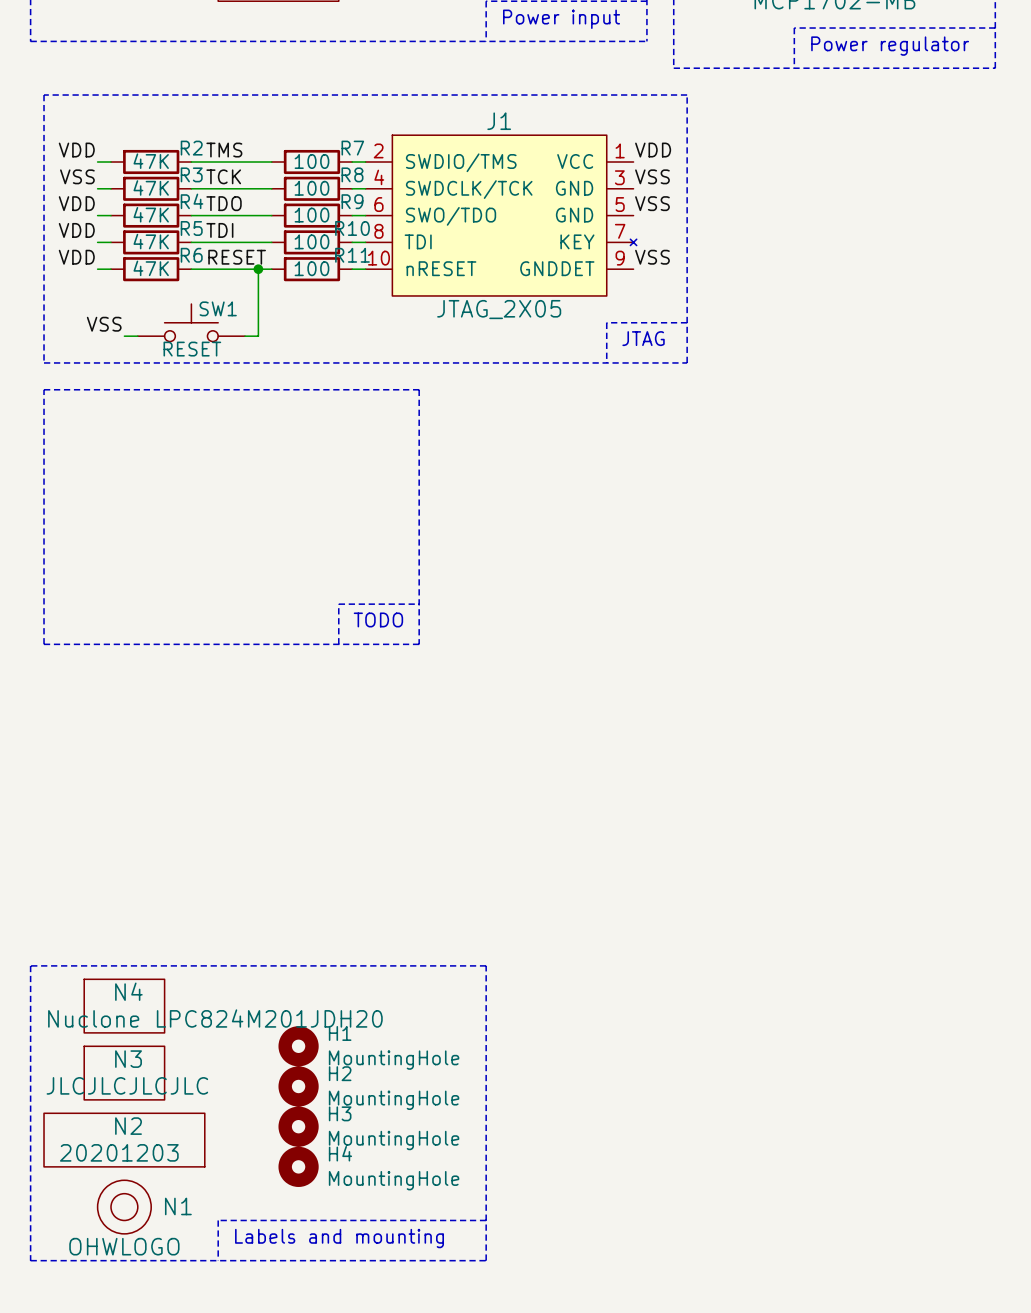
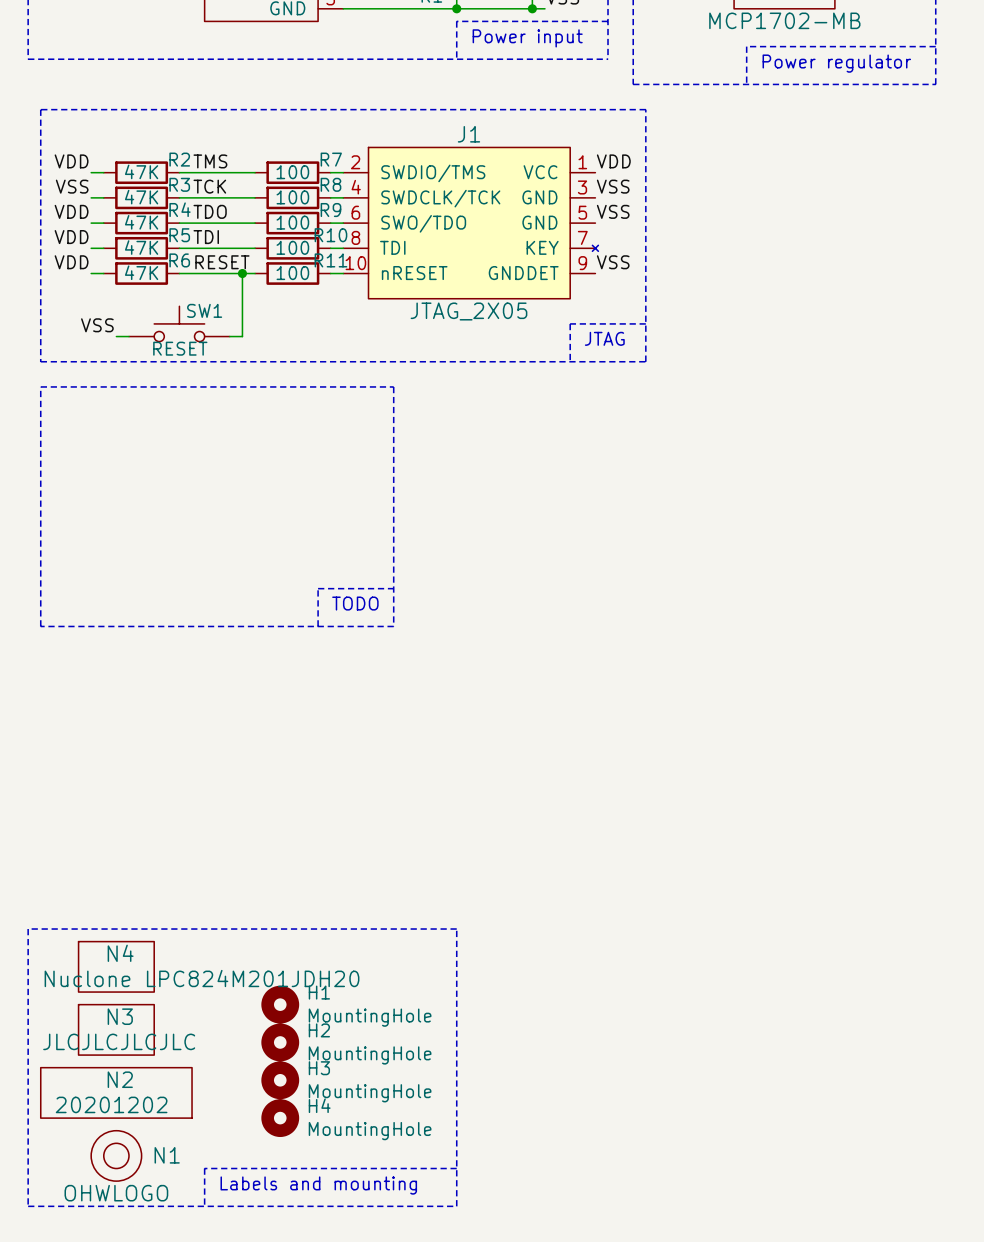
N2 value: 20201203 (119, 1152) -> 20201202 (111, 1104)

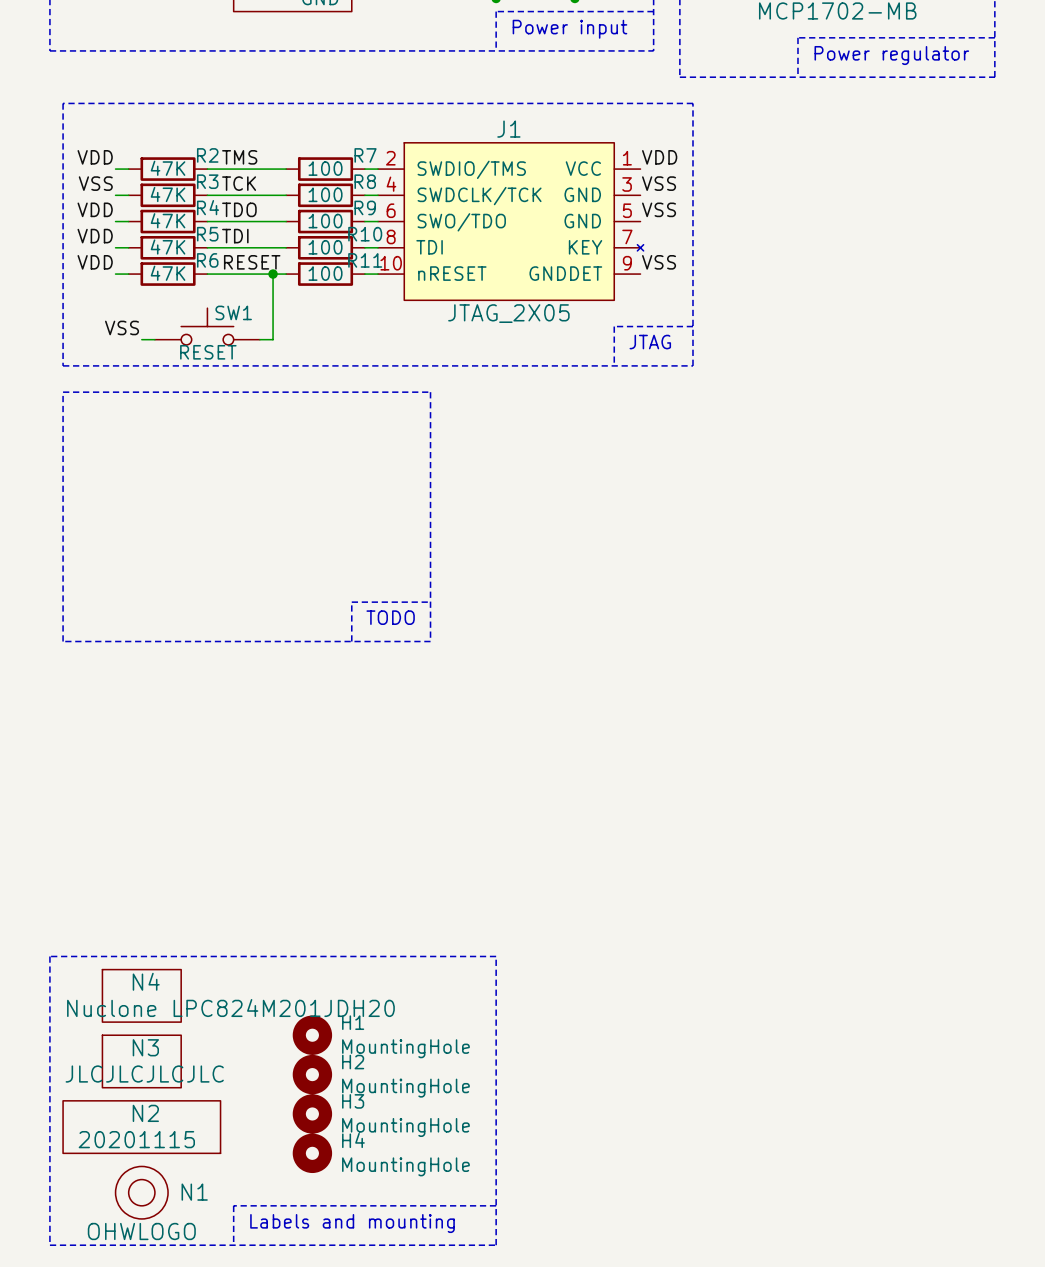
N2 value: 20201202 (111, 1104) -> 20201115 (136, 1139)

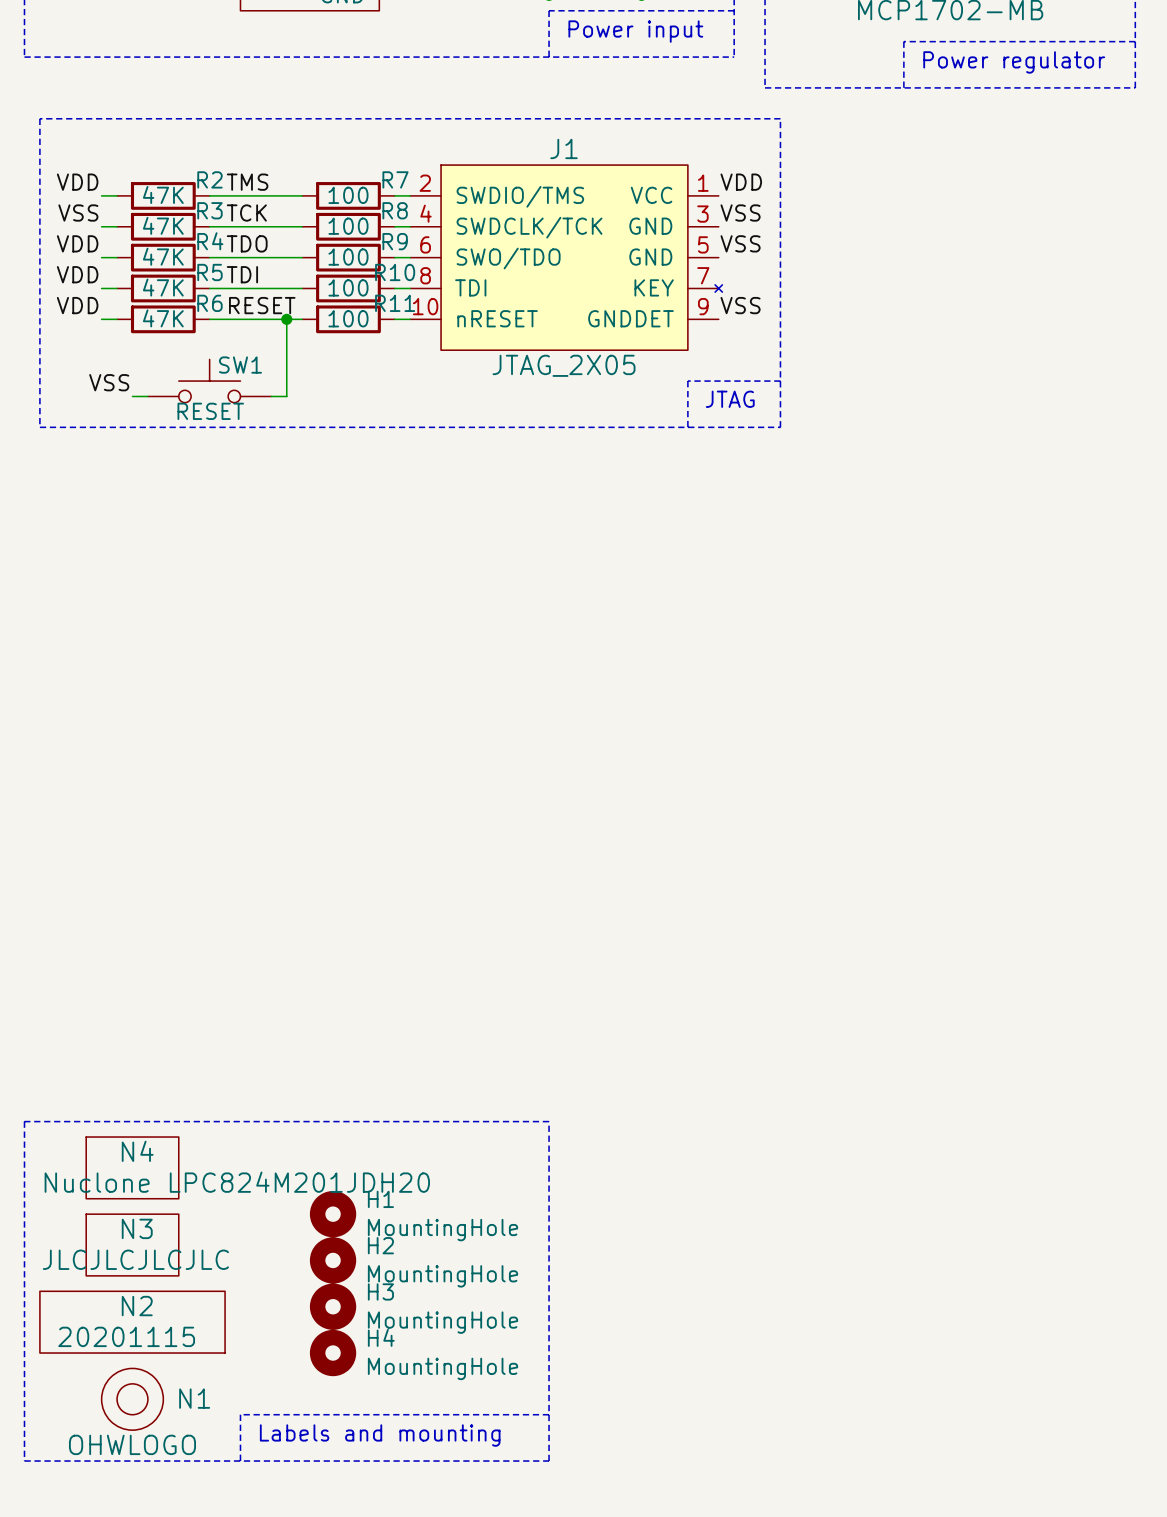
line: (63, 392) (63, 641) (430, 641) (430, 392) (63, 392) -> none
line: (430, 602) (351, 602) (351, 641) -> none
text: TODO (390, 617) -> none

